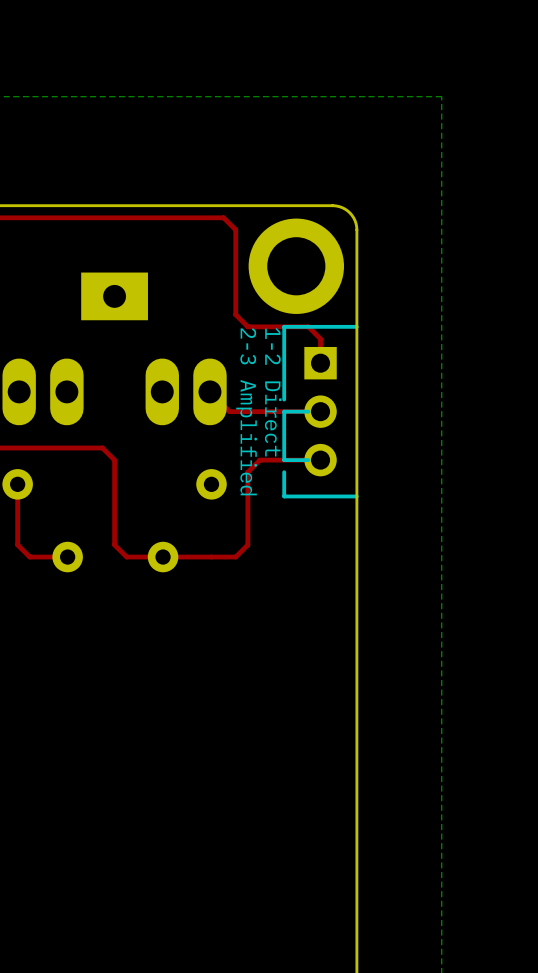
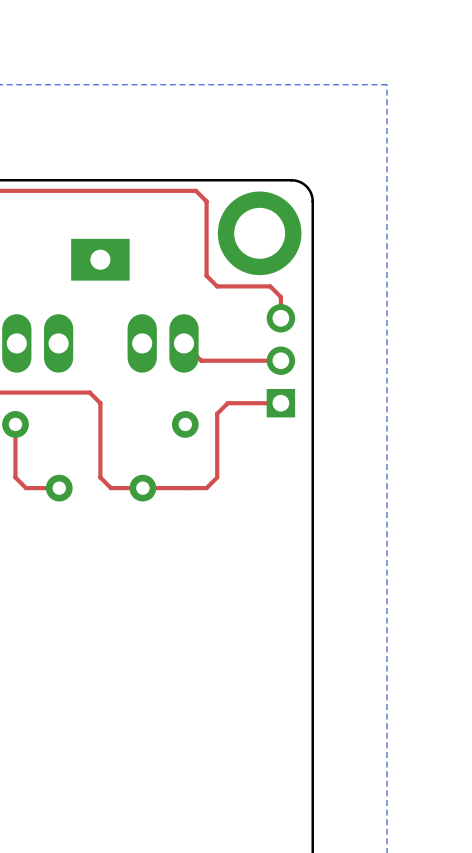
line: (356, 326) (284, 326) (284, 399) -> none
text: 1-2 Direct (273, 392) -> none
text: 2-3 Amplified (246, 411) -> none
line: (308, 411) (284, 411) (284, 460) (308, 460) -> none
part rotation: 0° (320, 411) -> 180° (280, 360)
line: (284, 472) (284, 496) (356, 496) -> none

